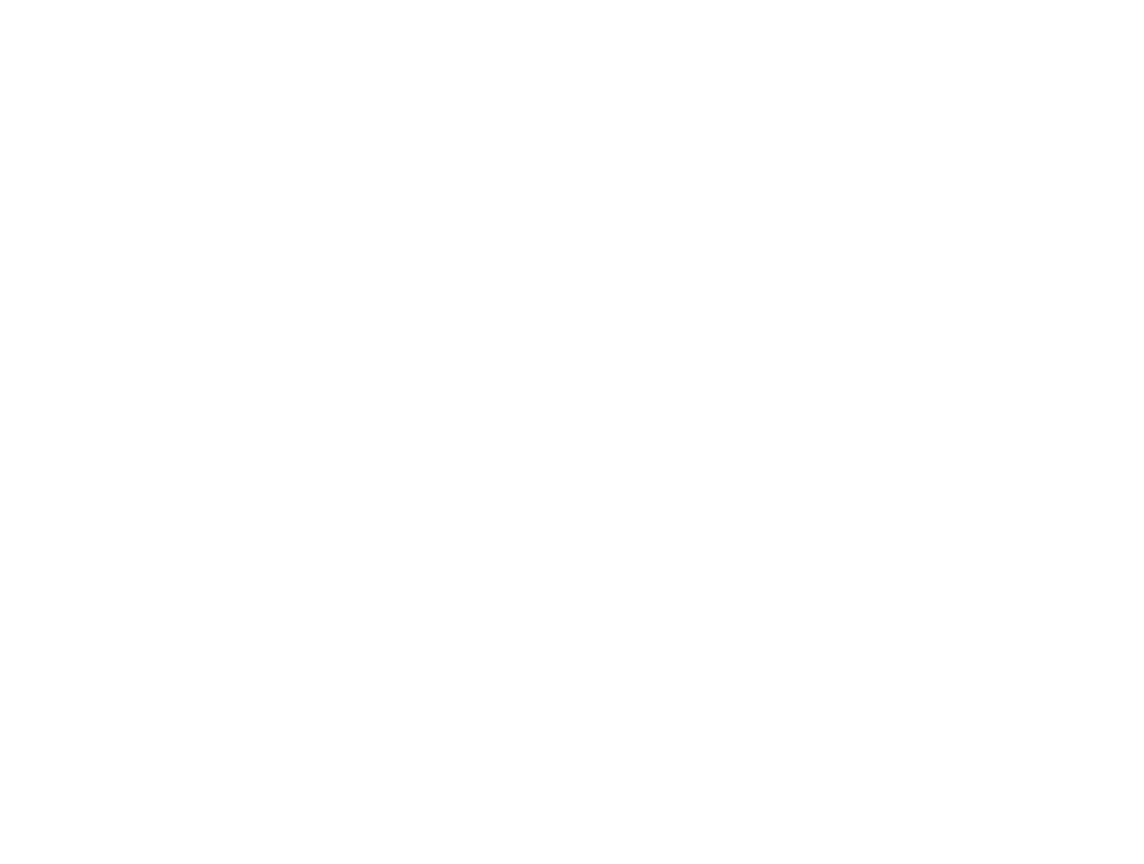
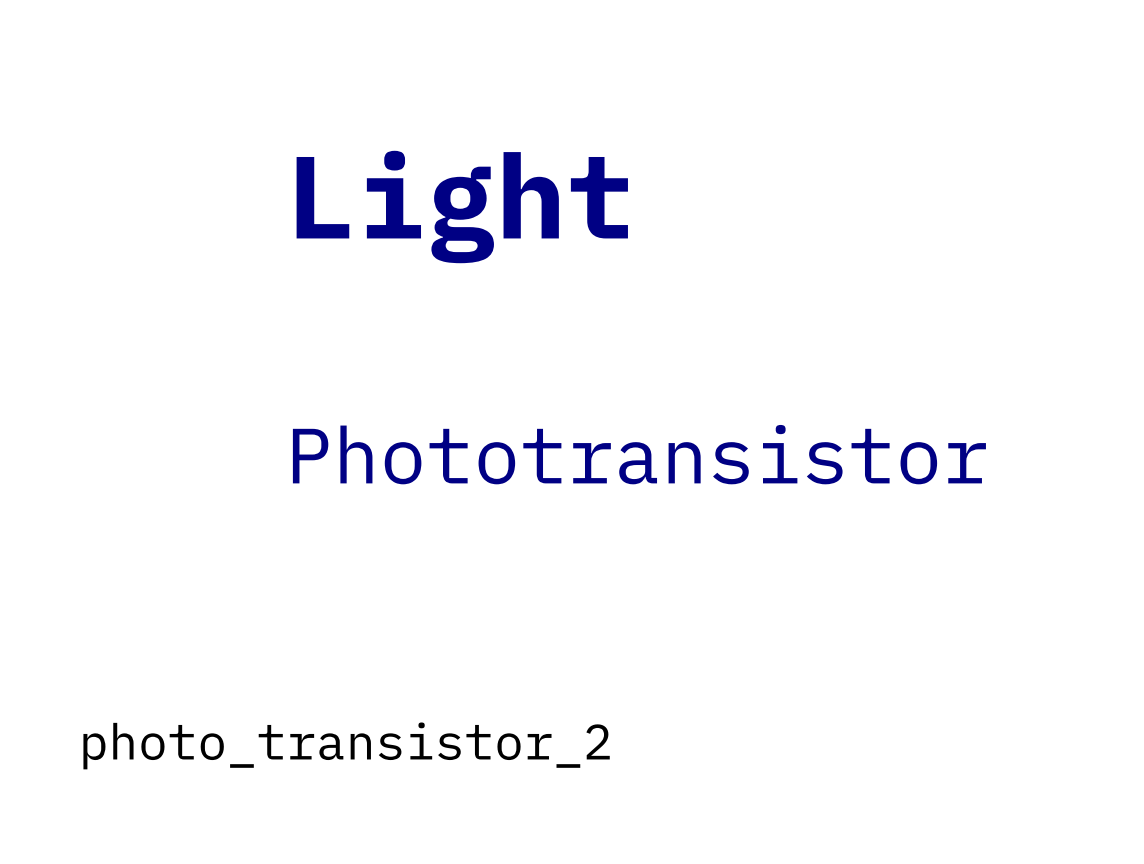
text: none -> Light (462, 207)
text: none -> Phototransistor (639, 454)
label: none -> photo_transistor_2 (346, 745)

